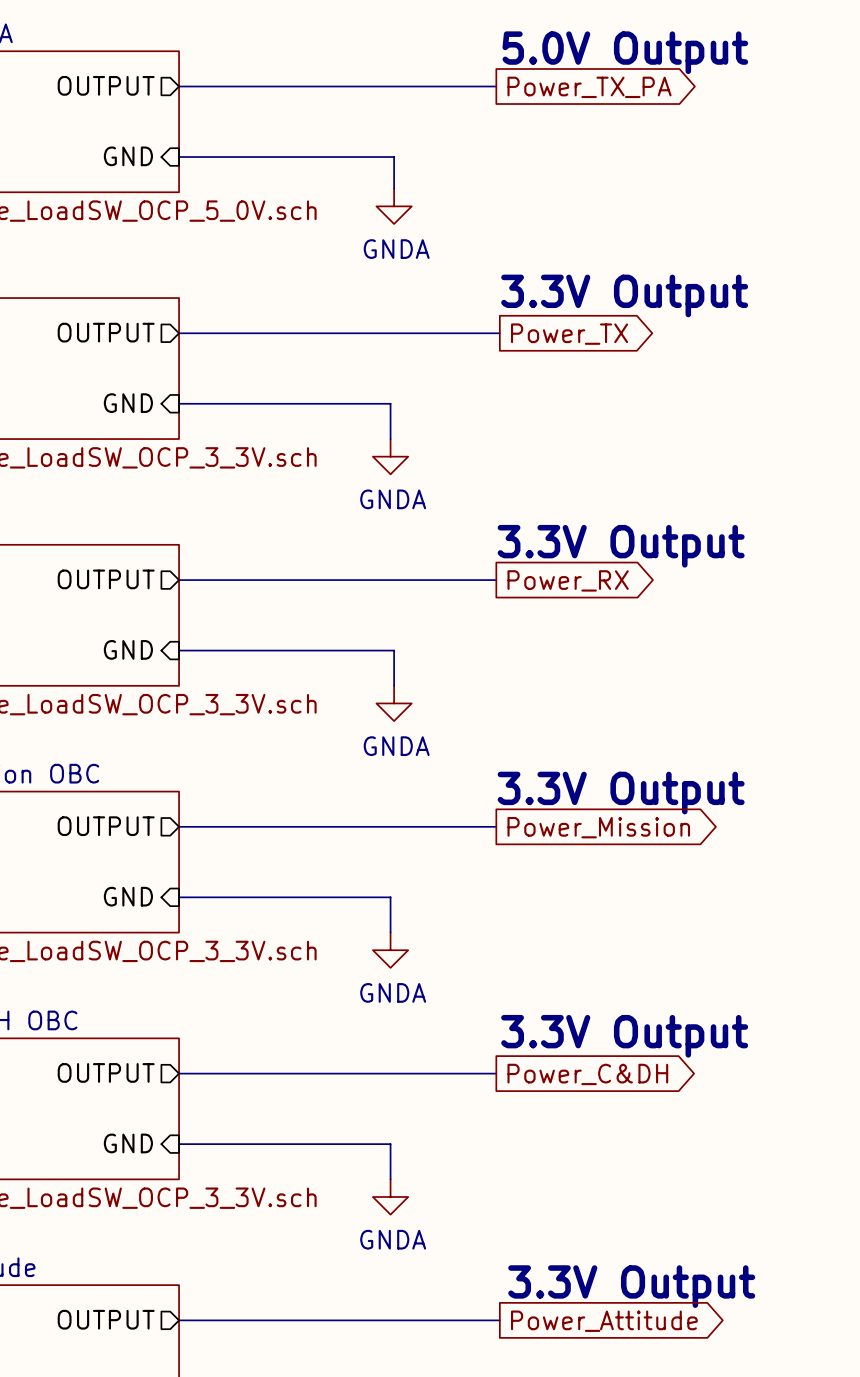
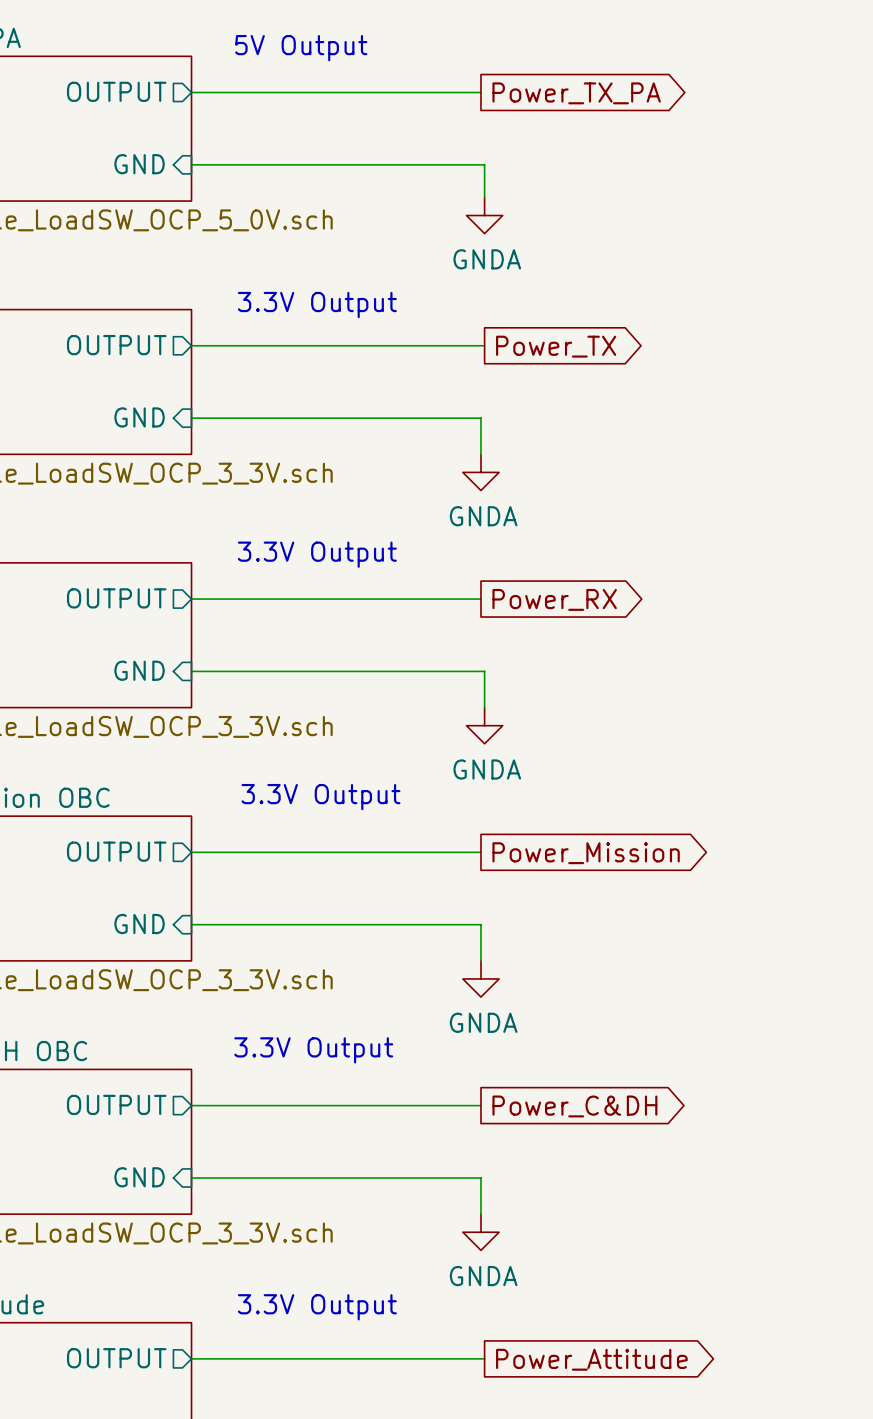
text: none -> 5V Output (301, 48)
text: 5.0V Output (625, 52) -> none
wire: (461, 86) (496, 86) -> none
global label position: Power_TX_PA (589, 87) -> Power_TX_PA (576, 93)
wire: (394, 157) (394, 188) -> (412, 164) (484, 164) (484, 197)
power symbol position: GNDA (394, 206) -> GNDA (484, 215)
text: none -> 3.3V Output (317, 305)
text: 3.3V Output (624, 295) -> none
wire: (464, 333) (499, 333) -> none
global label position: Power_TX (569, 334) -> Power_TX (556, 346)
wire: (390, 403) (390, 439) -> (408, 418) (480, 418) (480, 454)
power symbol position: GNDA (390, 456) -> GNDA (480, 472)
text: none -> 3.3V Output (317, 554)
text: 3.3V Output (621, 546) -> none
wire: (461, 580) (496, 580) -> none
global label position: Power_RX (568, 580) -> Power_RX (554, 599)
wire: (394, 650) (394, 685) -> (412, 671) (484, 671) (484, 707)
power symbol position: GNDA (394, 703) -> GNDA (484, 725)
text: none -> 3.3V Output (320, 797)
text: 3.3V Output (621, 793) -> none
wire: (461, 826) (496, 826) -> none
global label position: Power_Mission (598, 827) -> Power_Mission (586, 853)
wire: (390, 897) (390, 932) -> (408, 924) (480, 924) (480, 960)
power symbol position: GNDA (390, 950) -> GNDA (480, 978)
text: none -> 3.3V Output (313, 1050)
text: 3.3V Output (624, 1036) -> none
wire: (461, 1073) (496, 1073) -> none
global label position: Power_C&DH (587, 1074) -> Power_C&DH (574, 1106)
wire: (390, 1144) (390, 1179) -> (408, 1177) (480, 1177) (480, 1214)
power symbol position: GNDA (390, 1197) -> GNDA (480, 1232)
text: none -> 3.3V Output (317, 1307)
text: 3.3V Output (631, 1286) -> none
wire: (464, 1320) (499, 1320) -> none
global label position: Power_Attitude (604, 1321) -> Power_Attitude (591, 1359)

